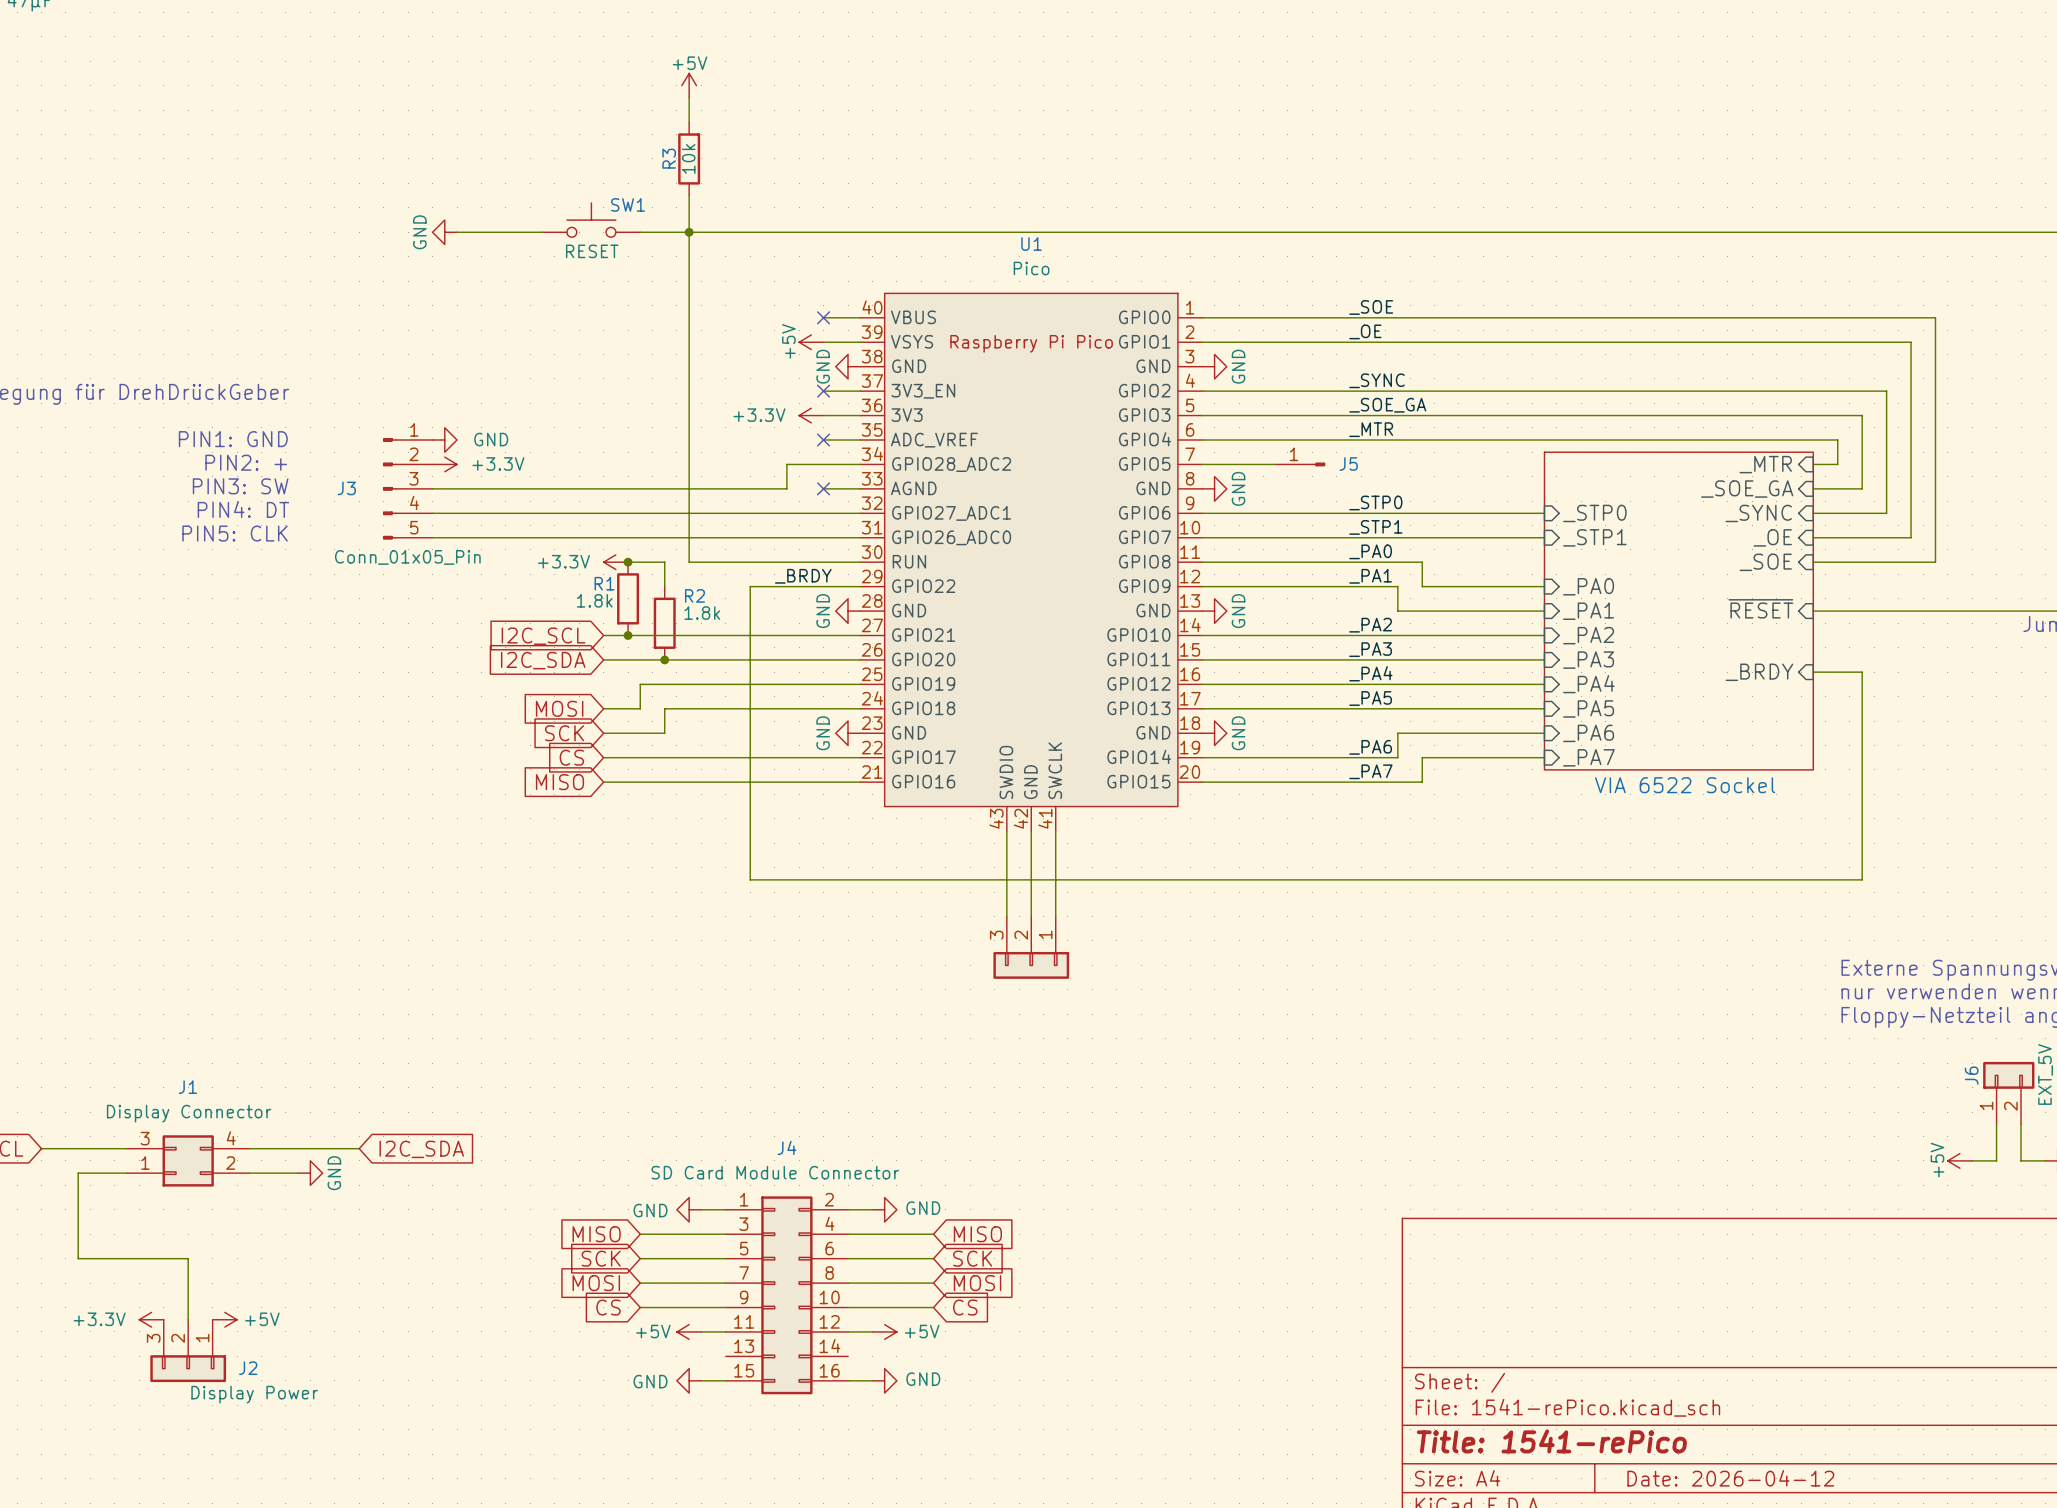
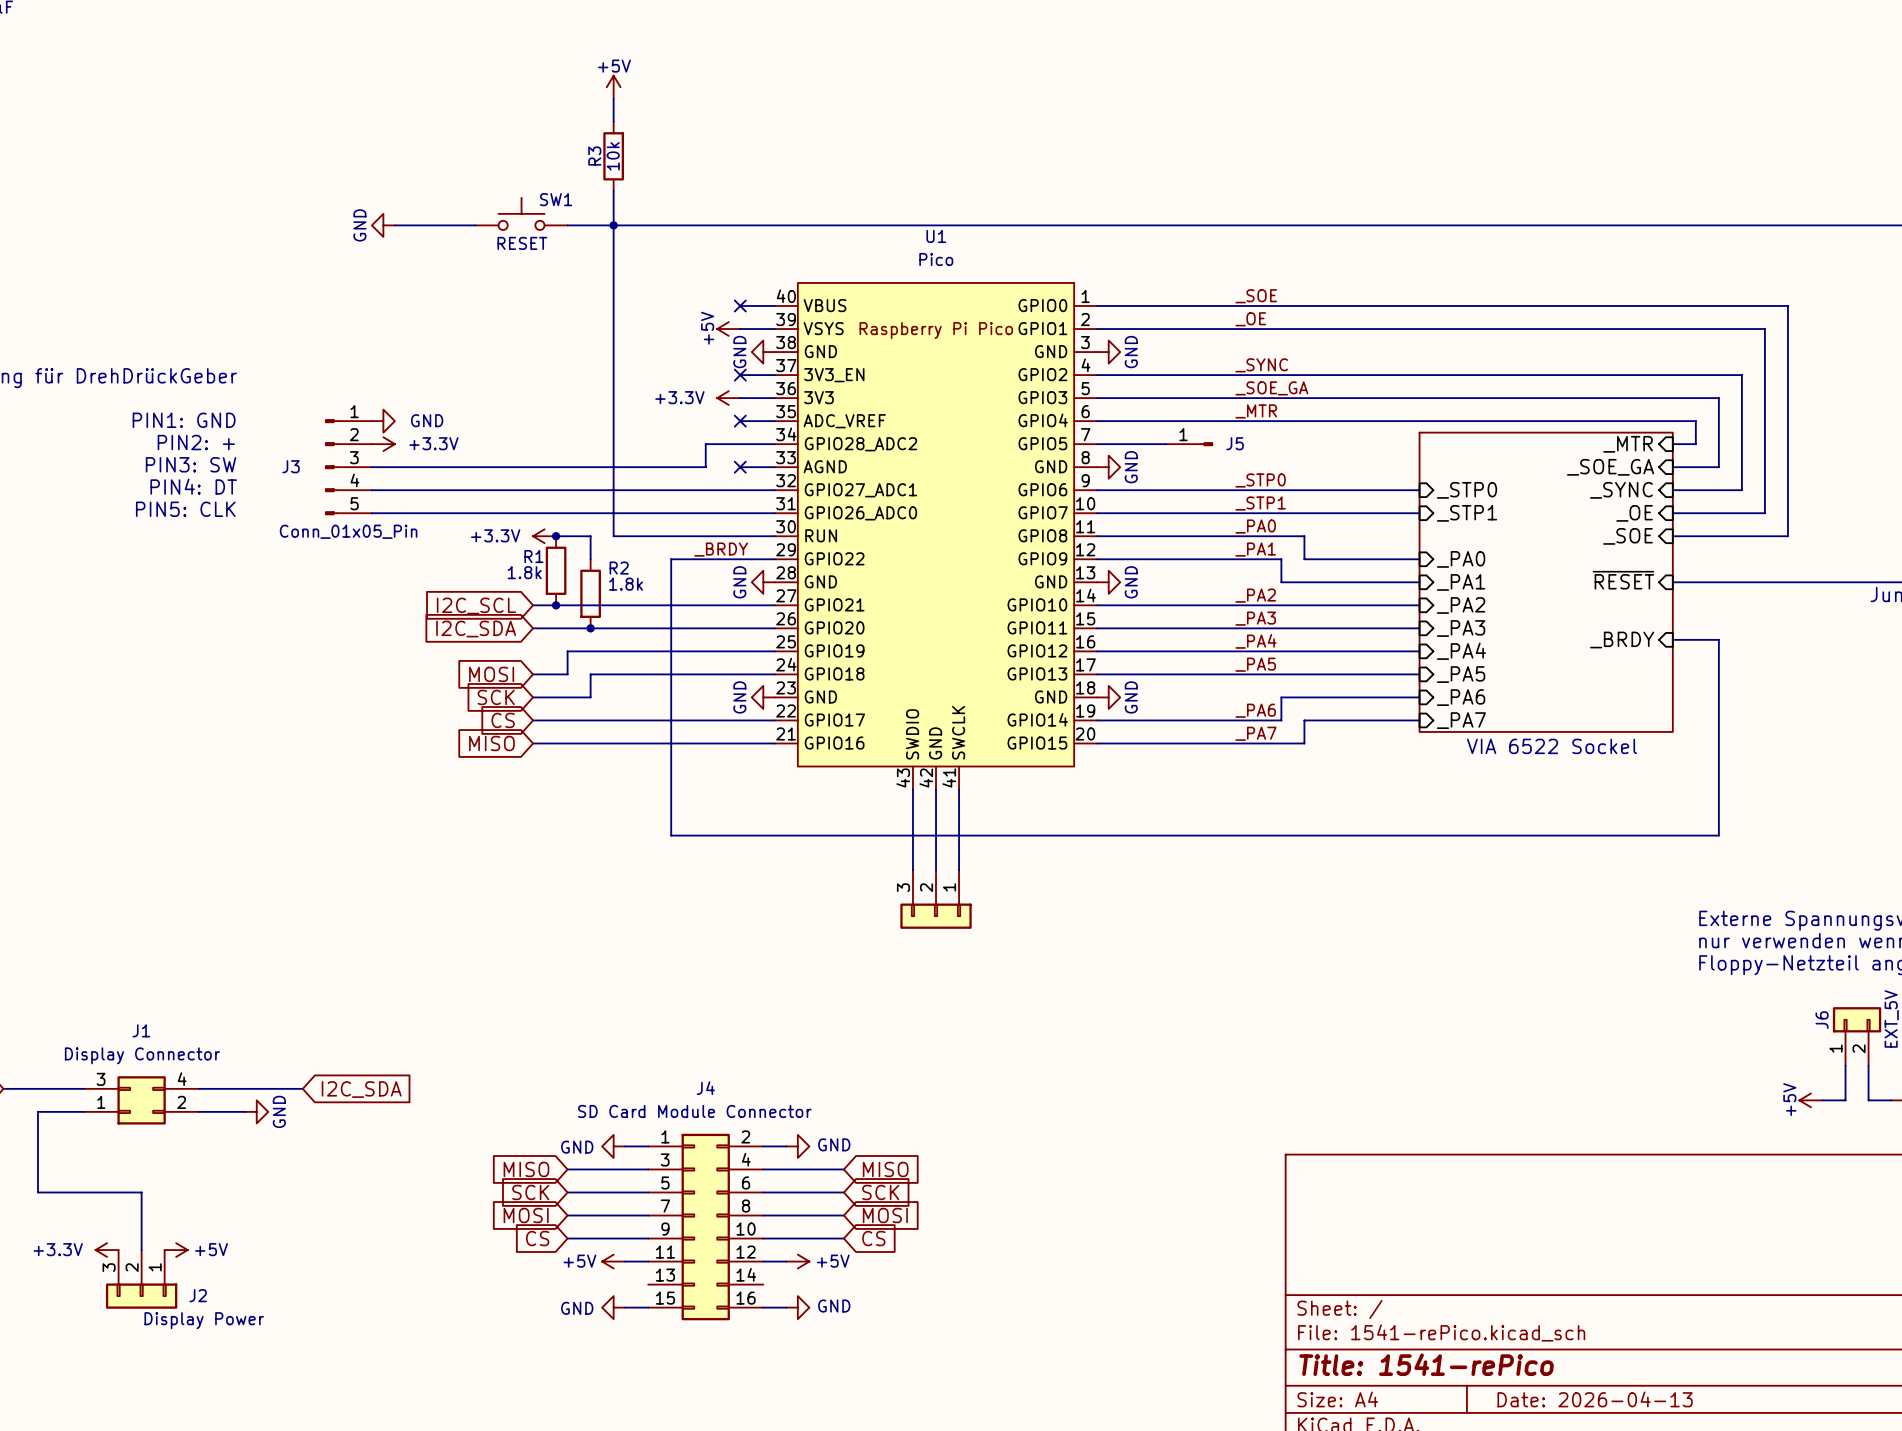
title block: Date: 2026-04-12 (1730, 1478) -> Date: 2026-04-13 (1595, 1399)

